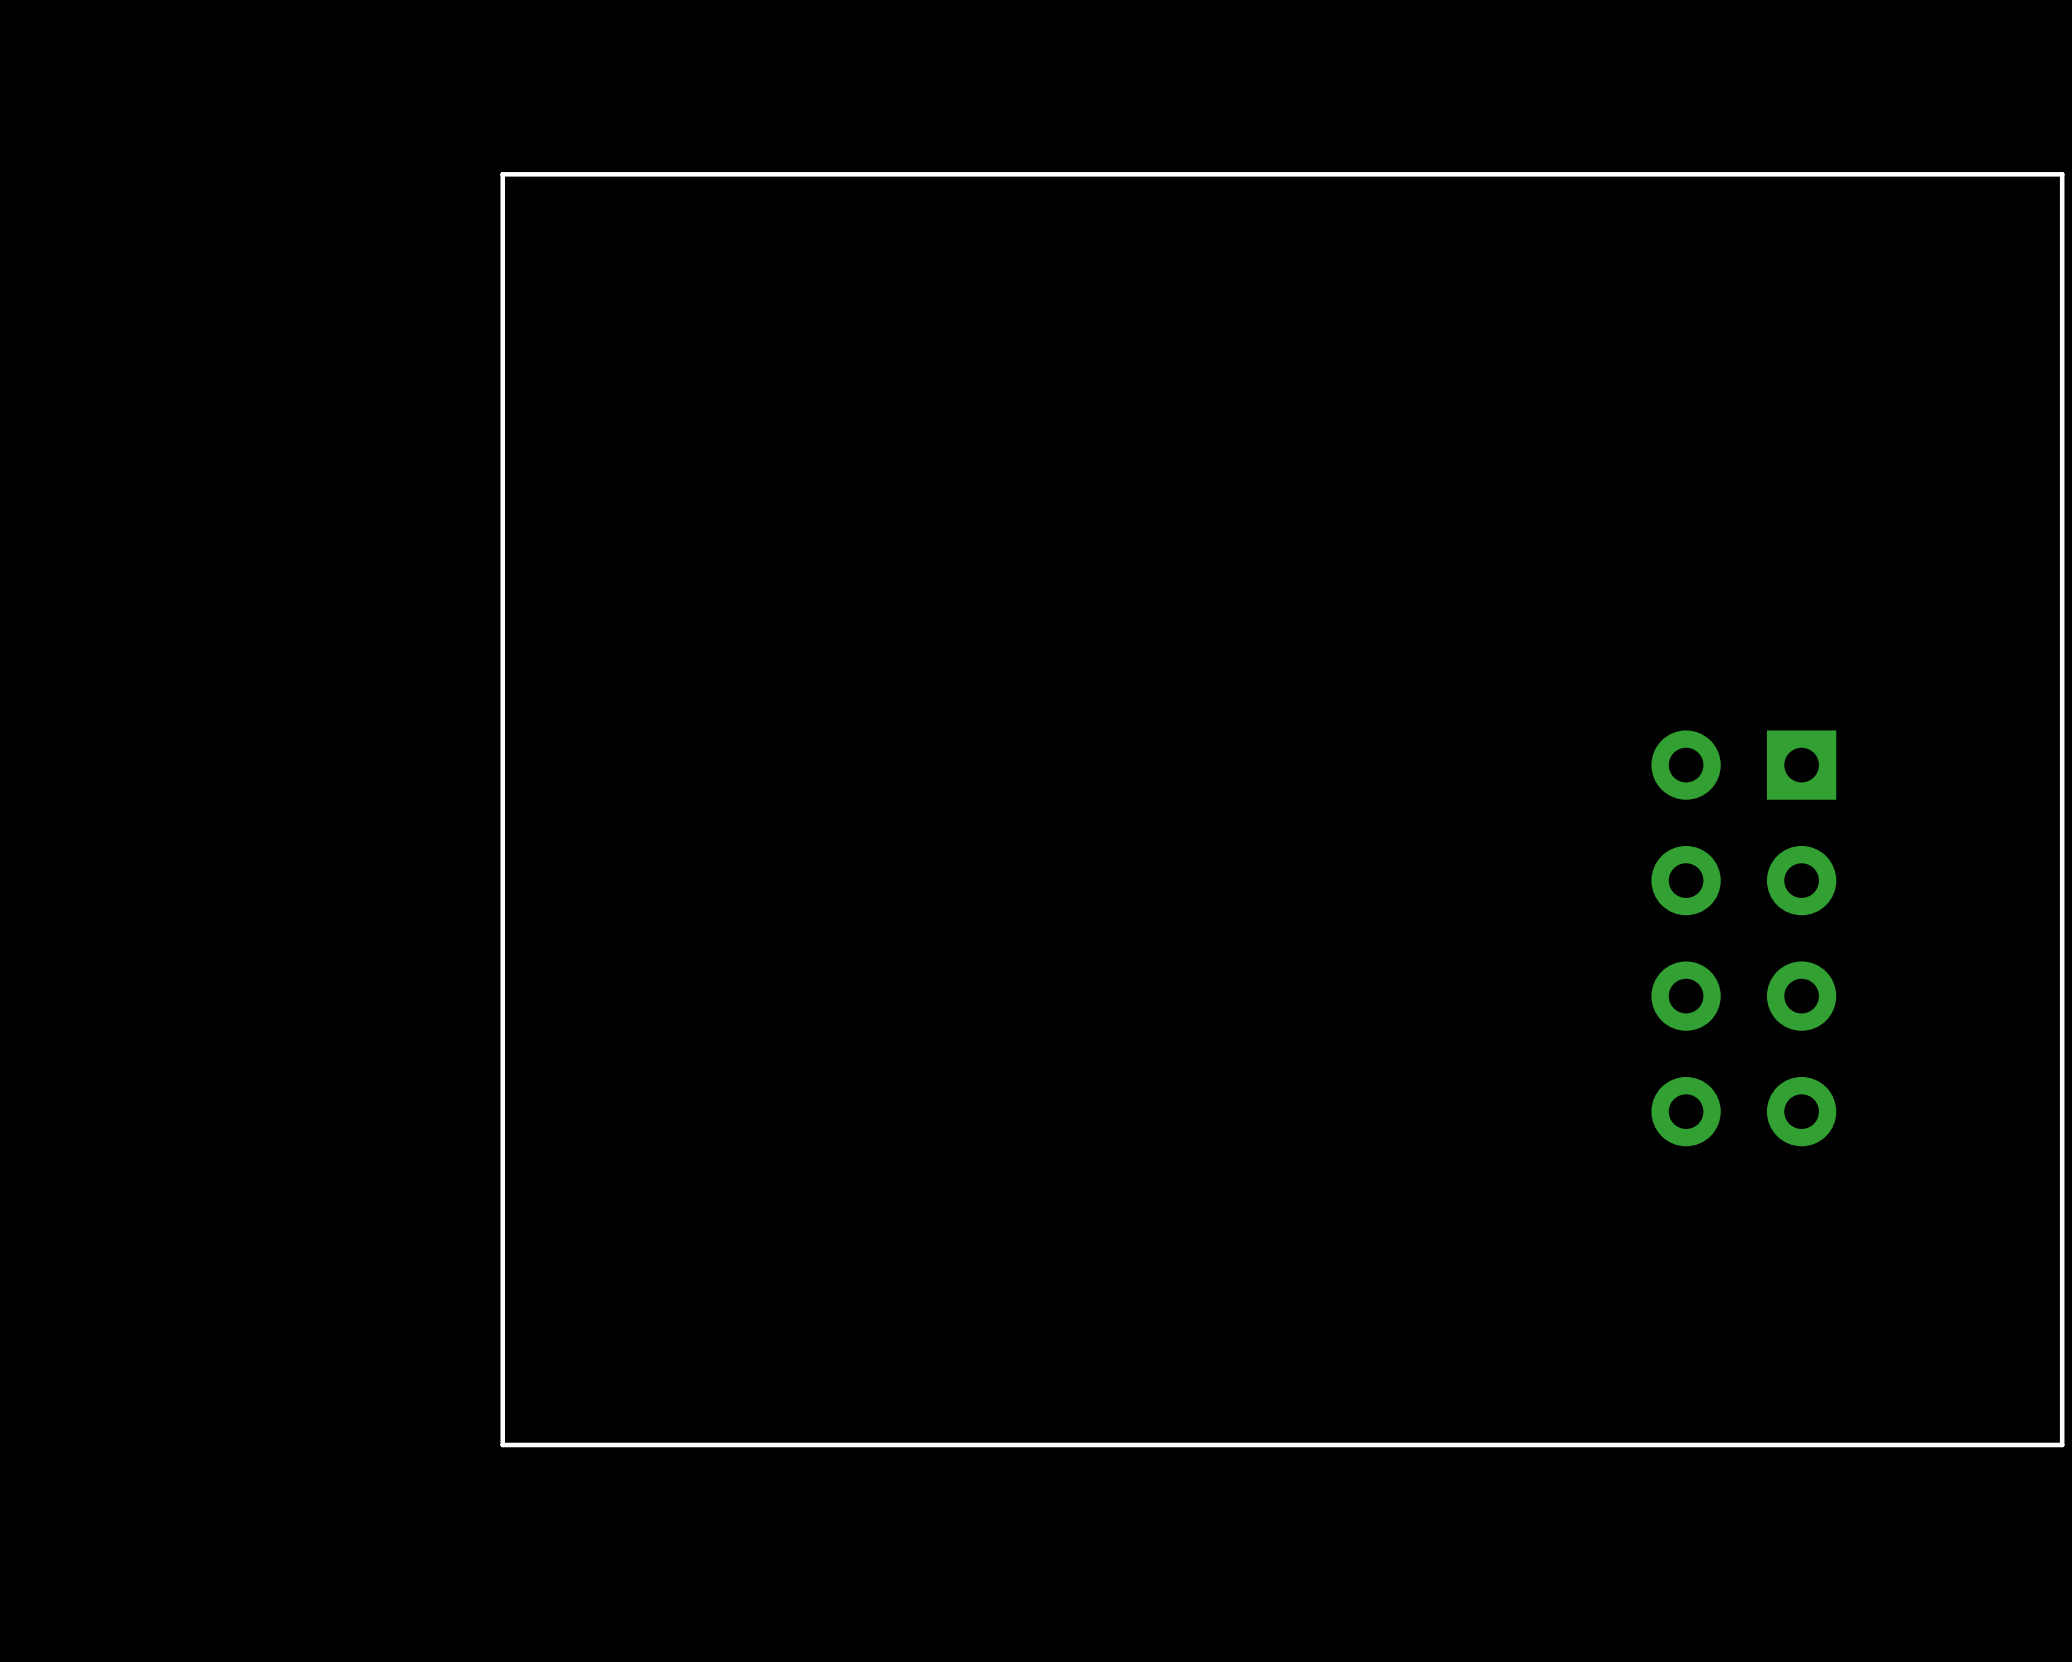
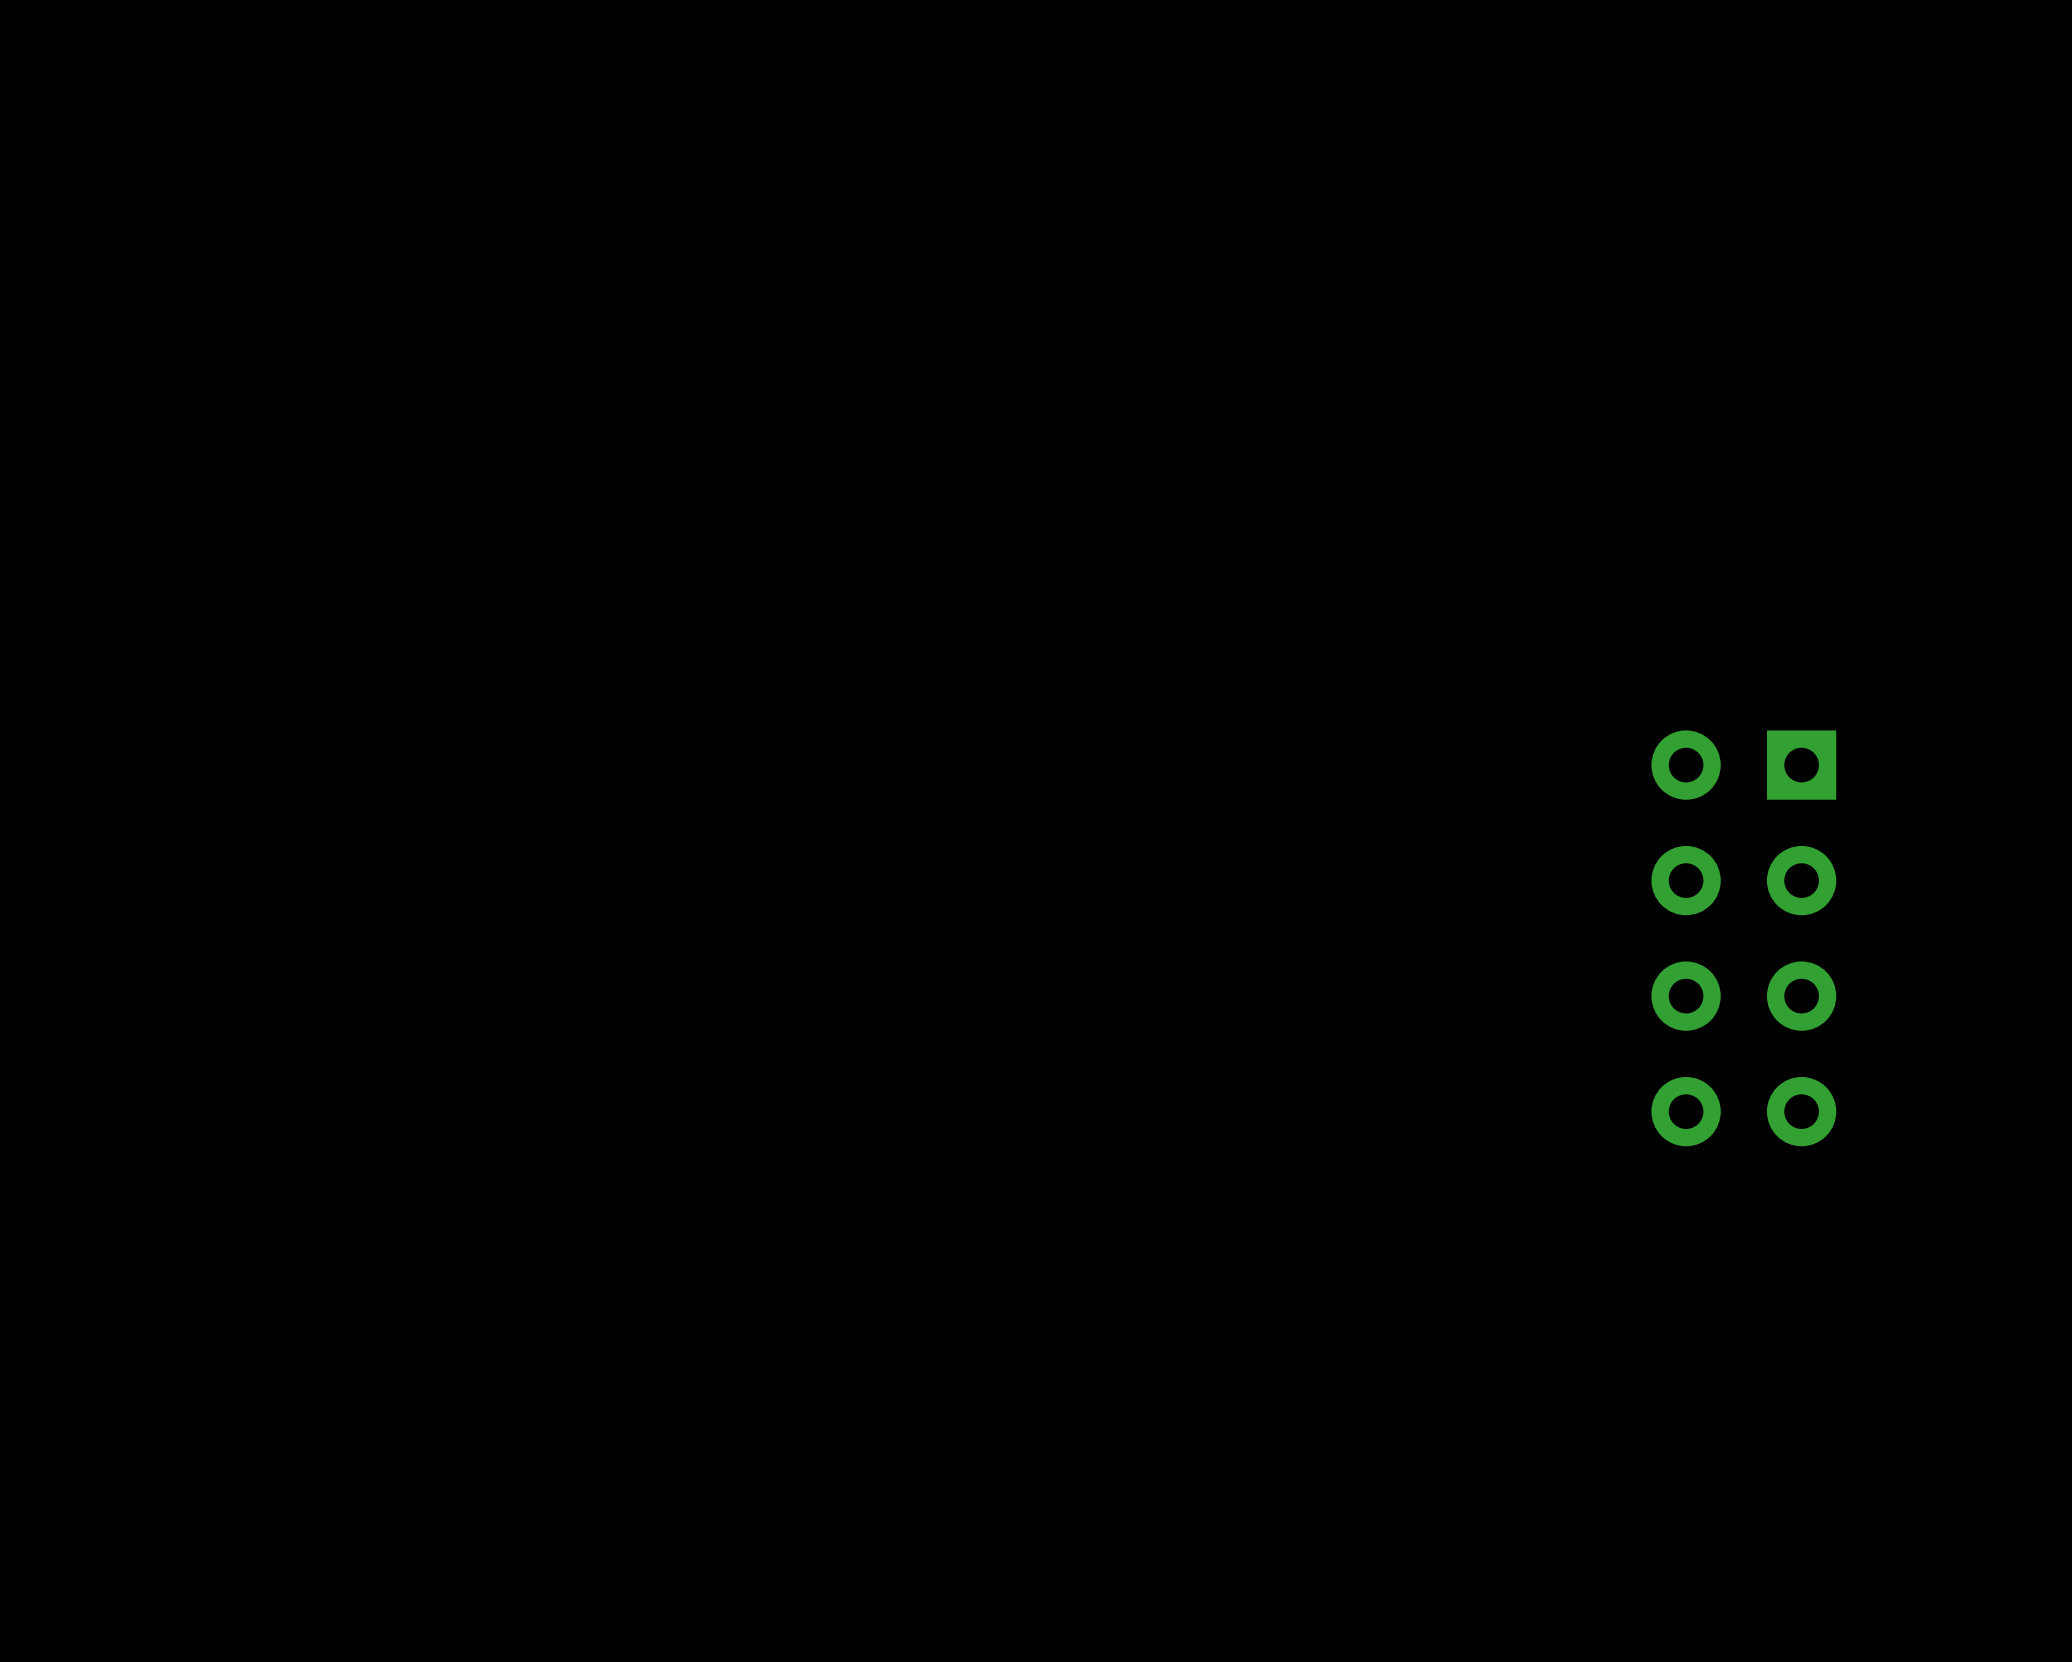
board edge: (2062, 174) (502, 174) (502, 1444) (2062, 1444) (2062, 174) -> none

